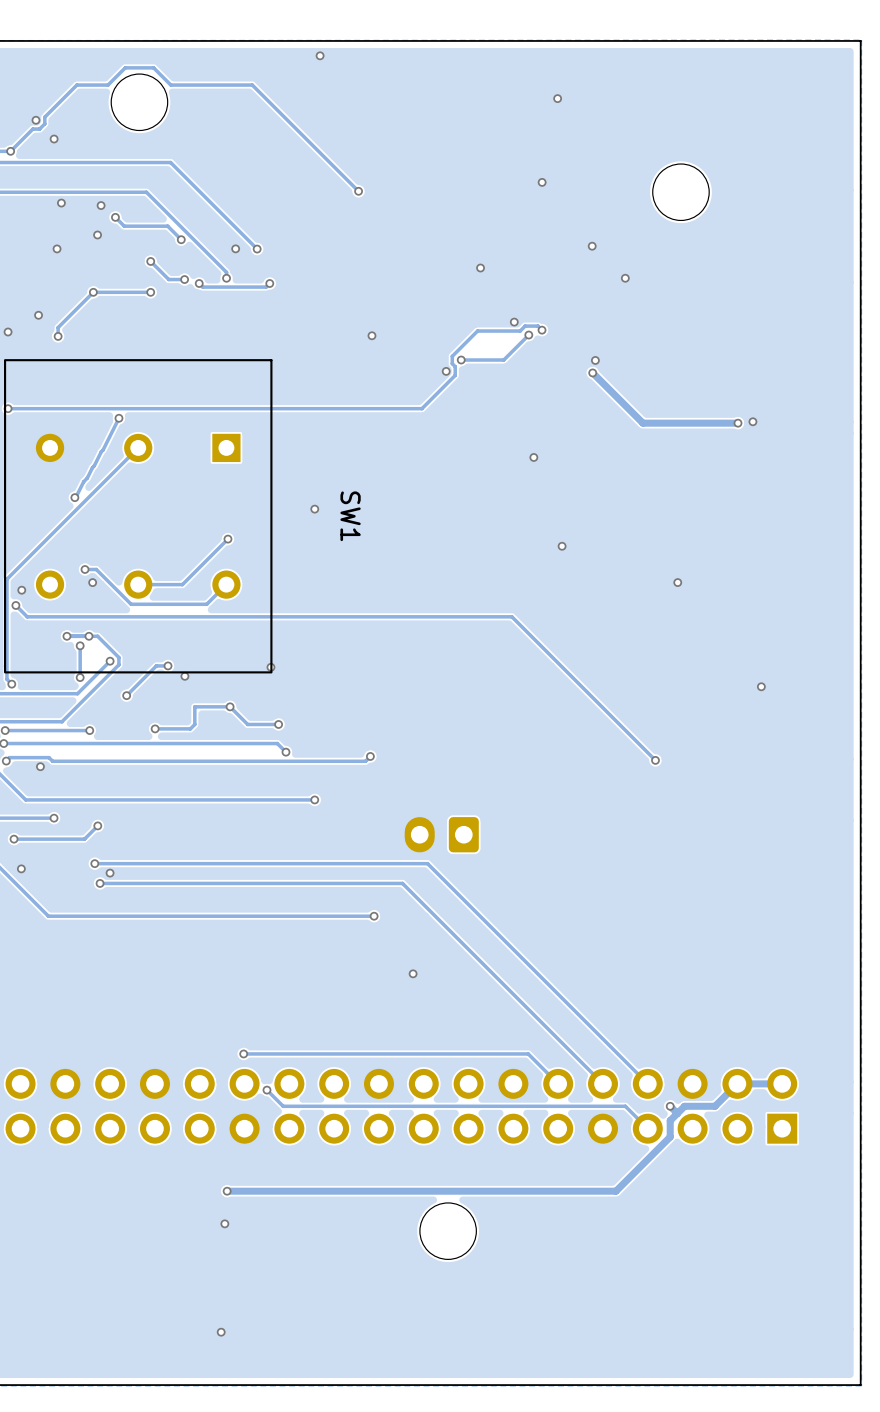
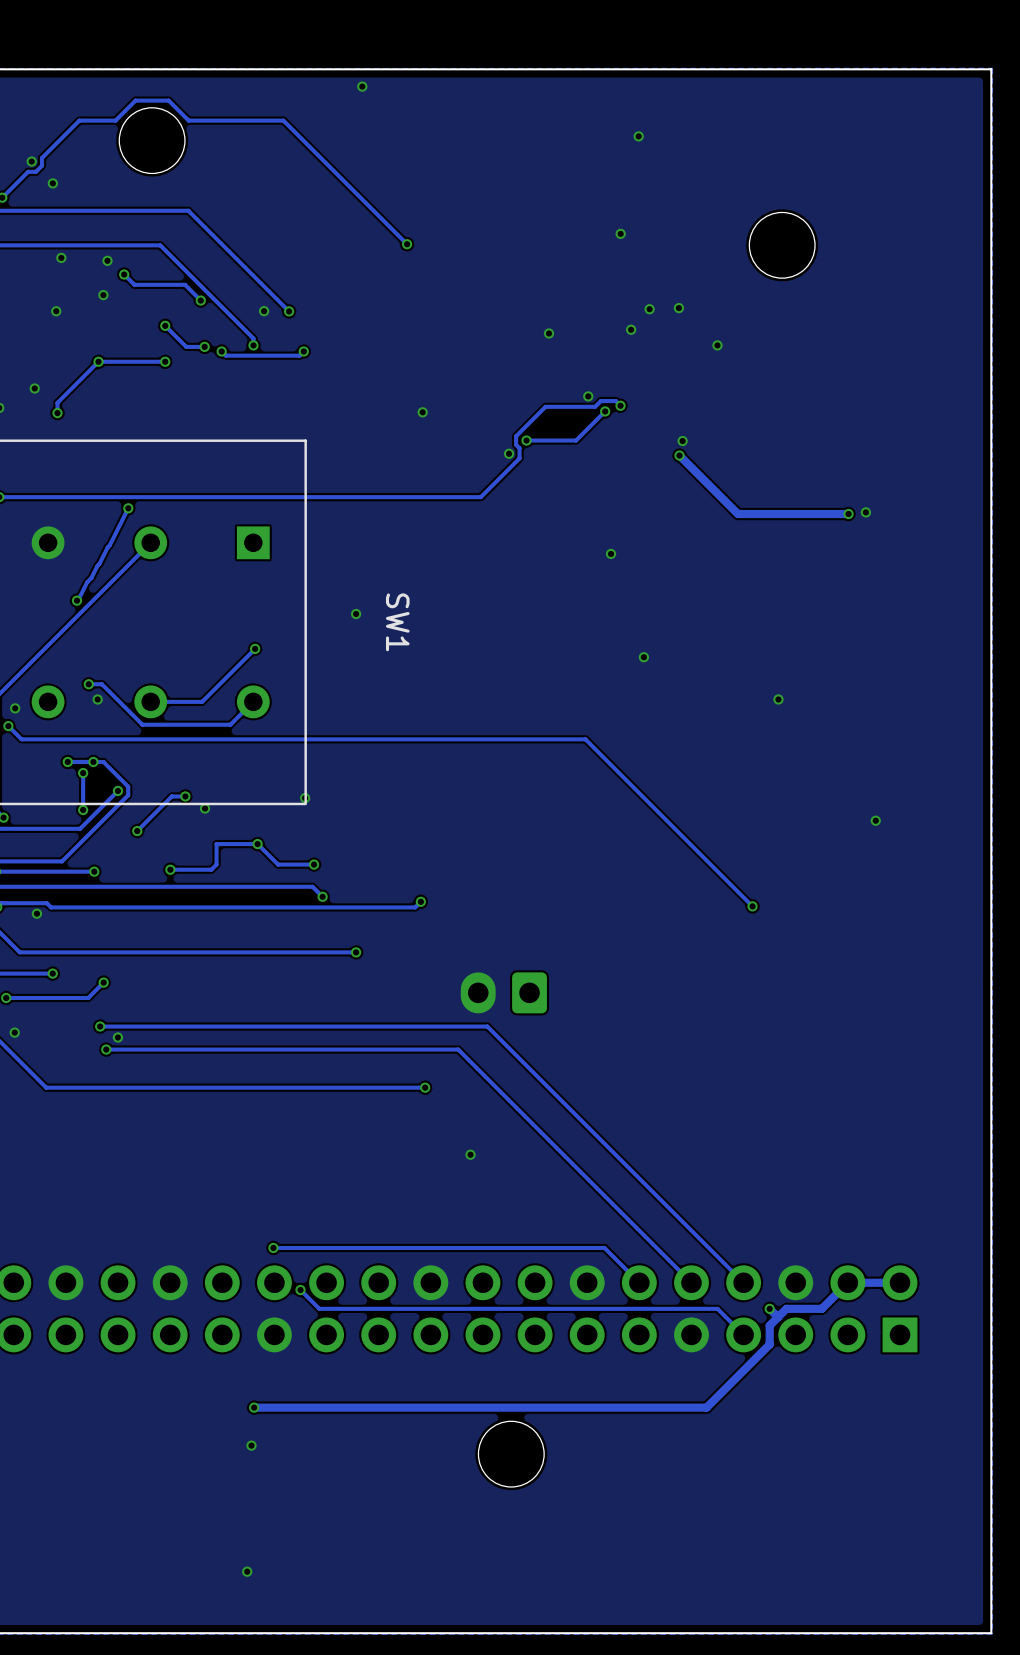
via: none -> (649, 309)
via: none -> (631, 329)

